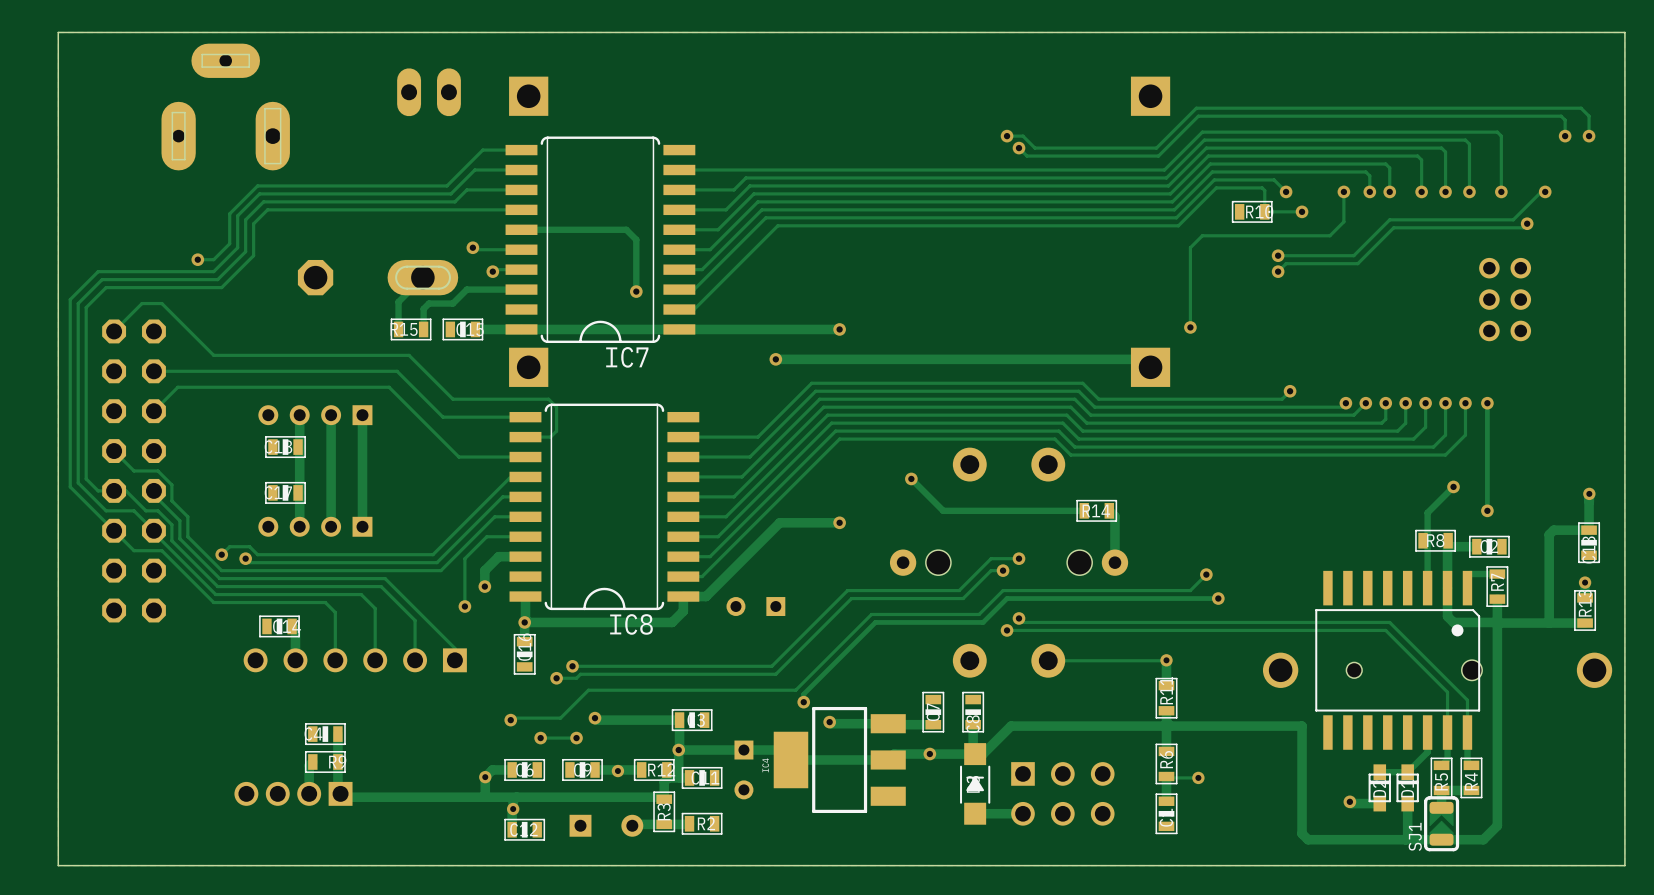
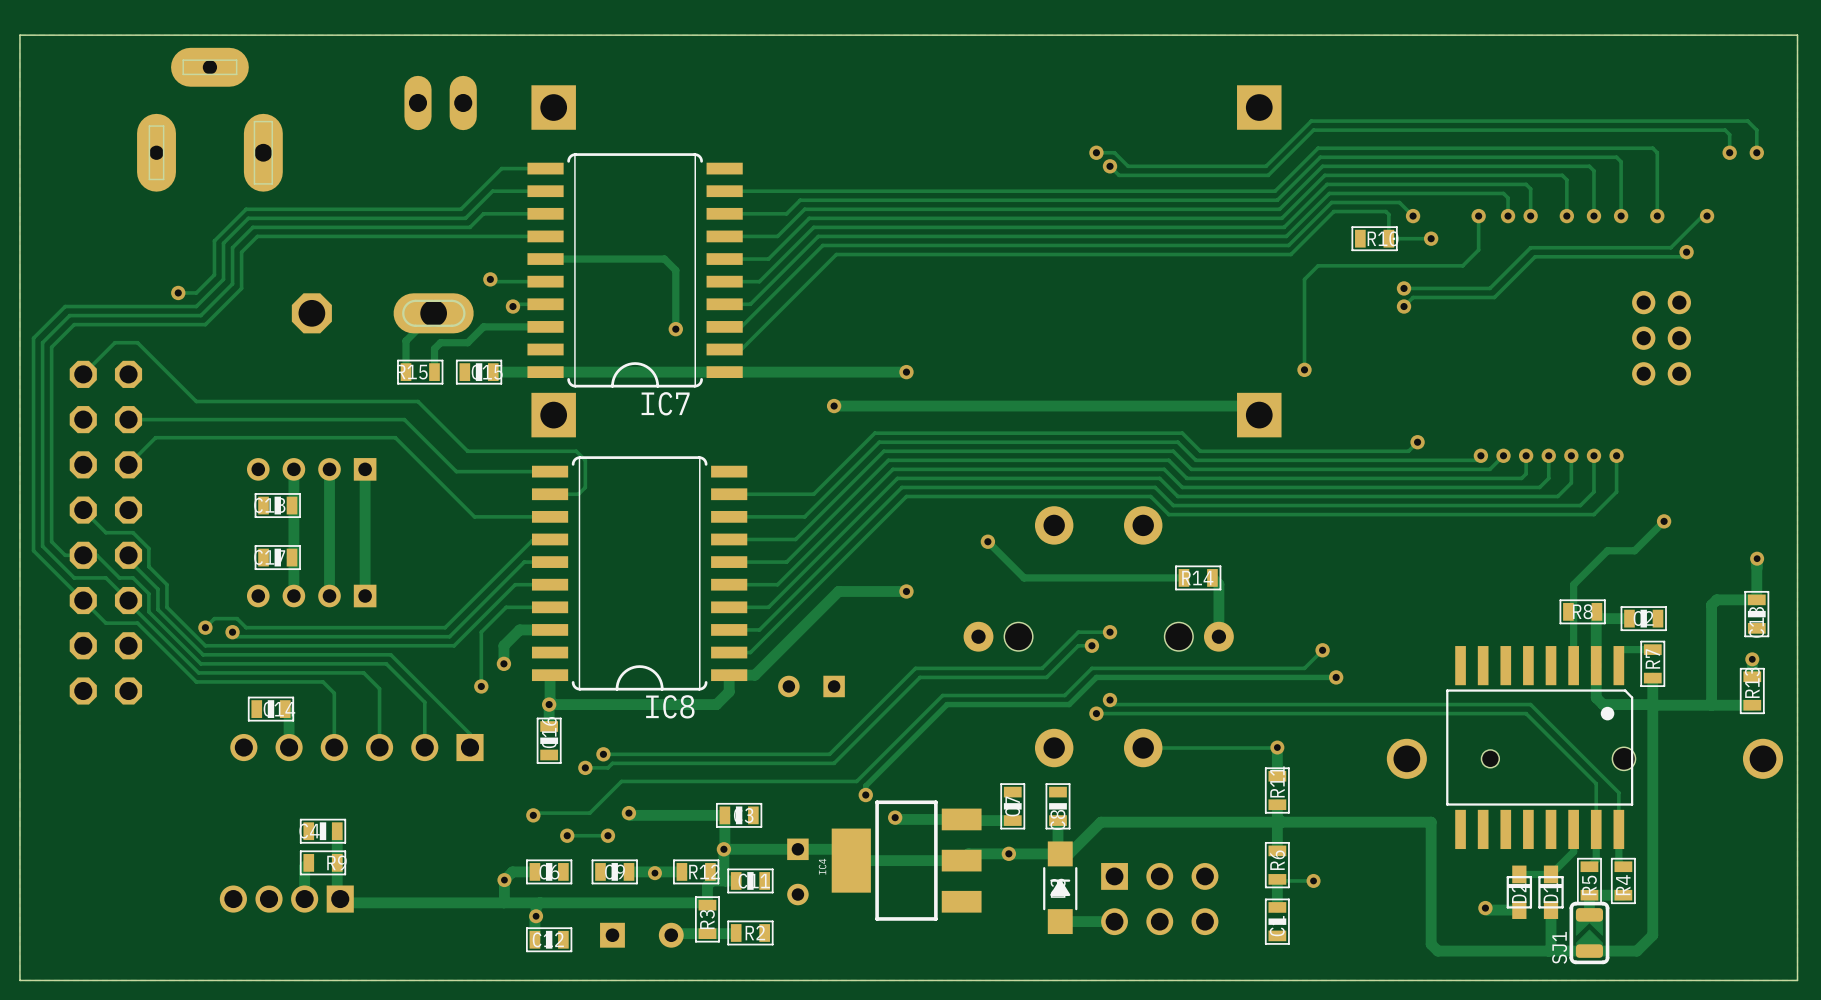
track: (1487, 403) (1487, 510) -> none
via: (1487, 403) -> none
via: none -> (1664, 521)
track: (1453, 486) (1427, 512) (1427, 516) -> (1664, 521) (1634, 550) (1607, 550) (1573, 584)
via: (1453, 486) -> none
via: (1487, 510) -> none

